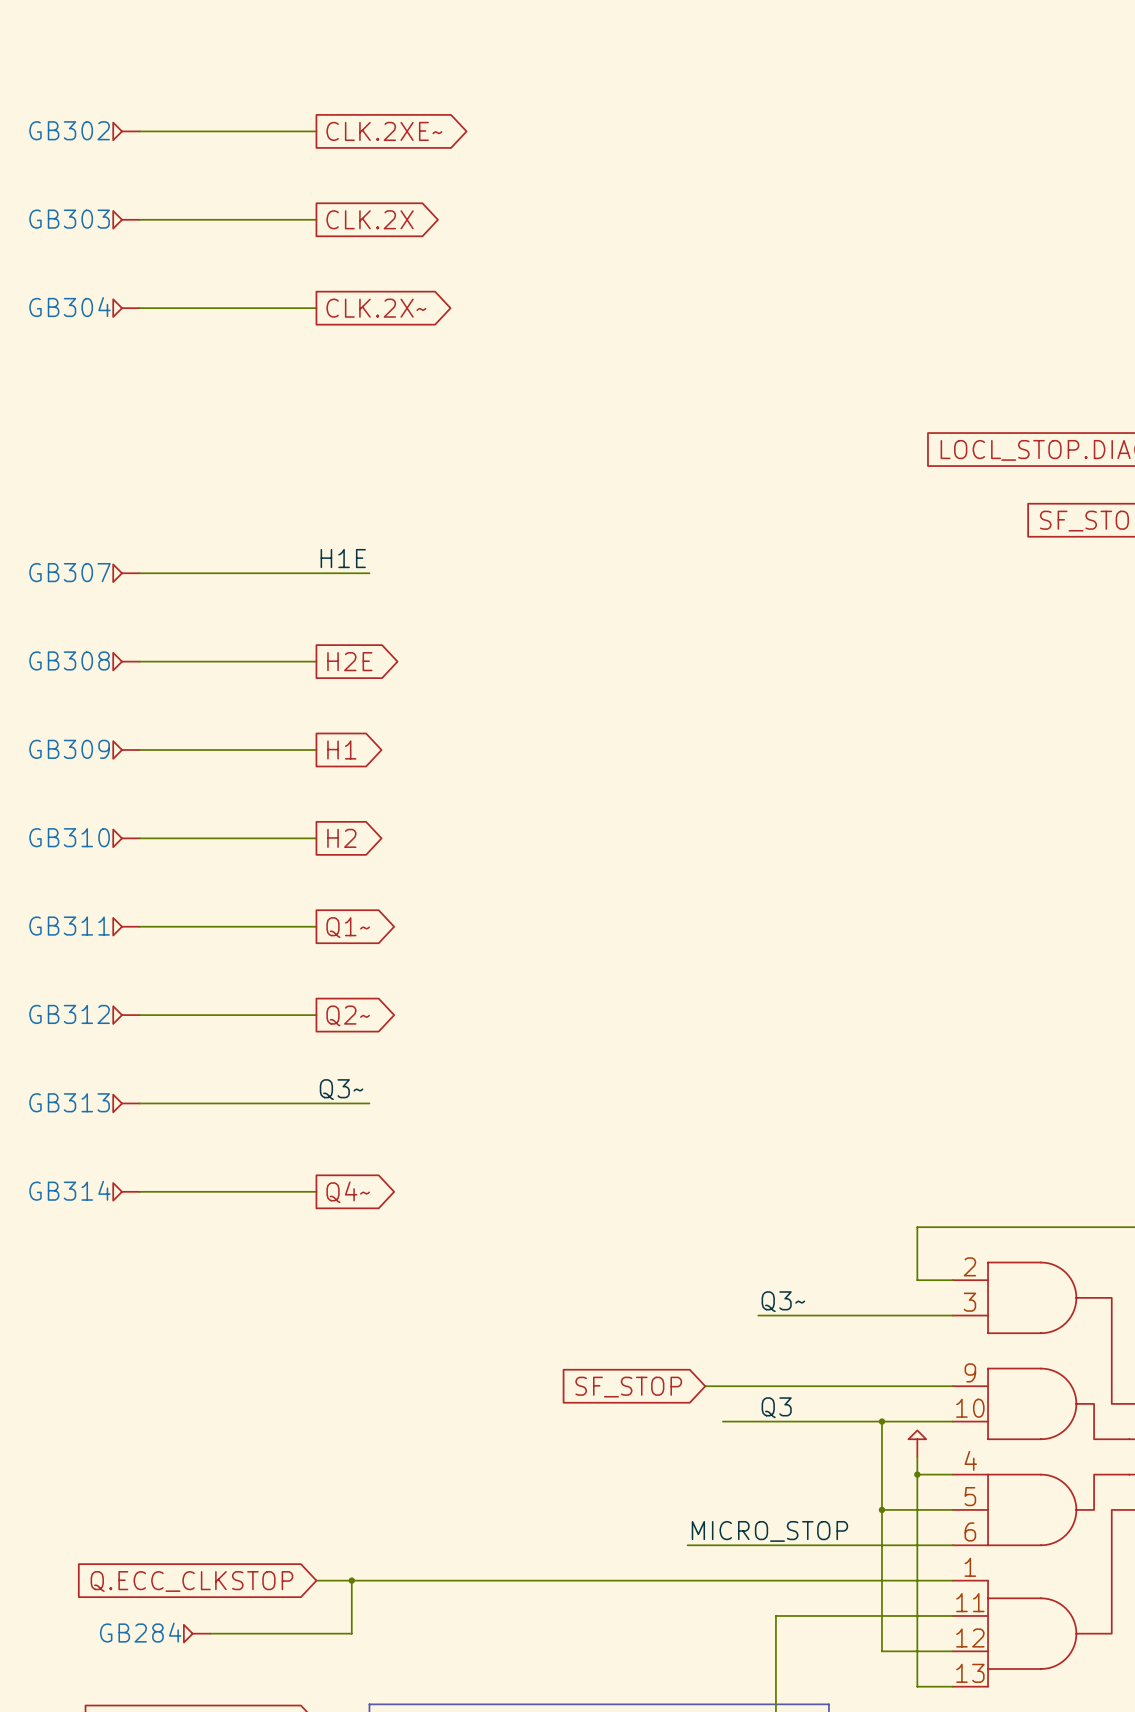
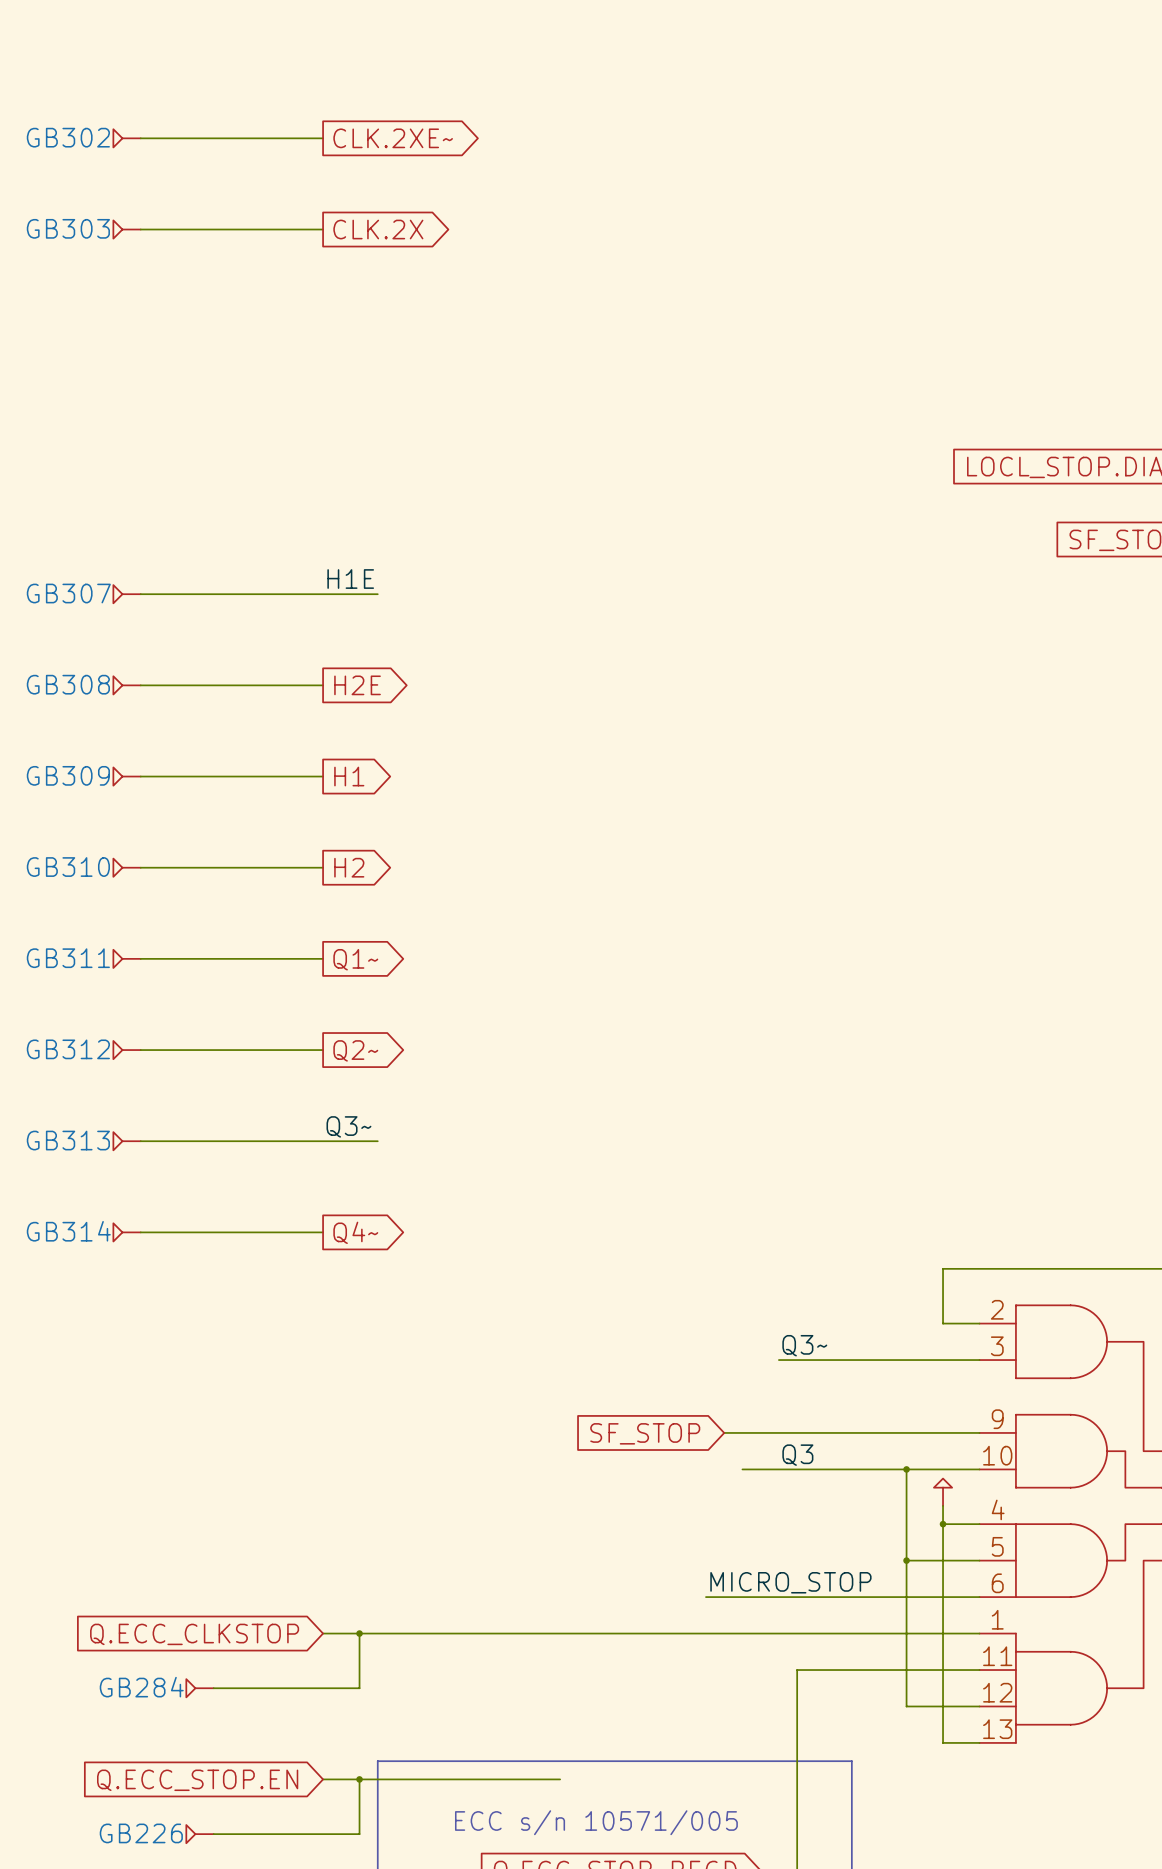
GB304: (126, 308) -> none
wire: (139, 308) (316, 308) -> none
global label: CLK.2X~ (376, 308) -> none

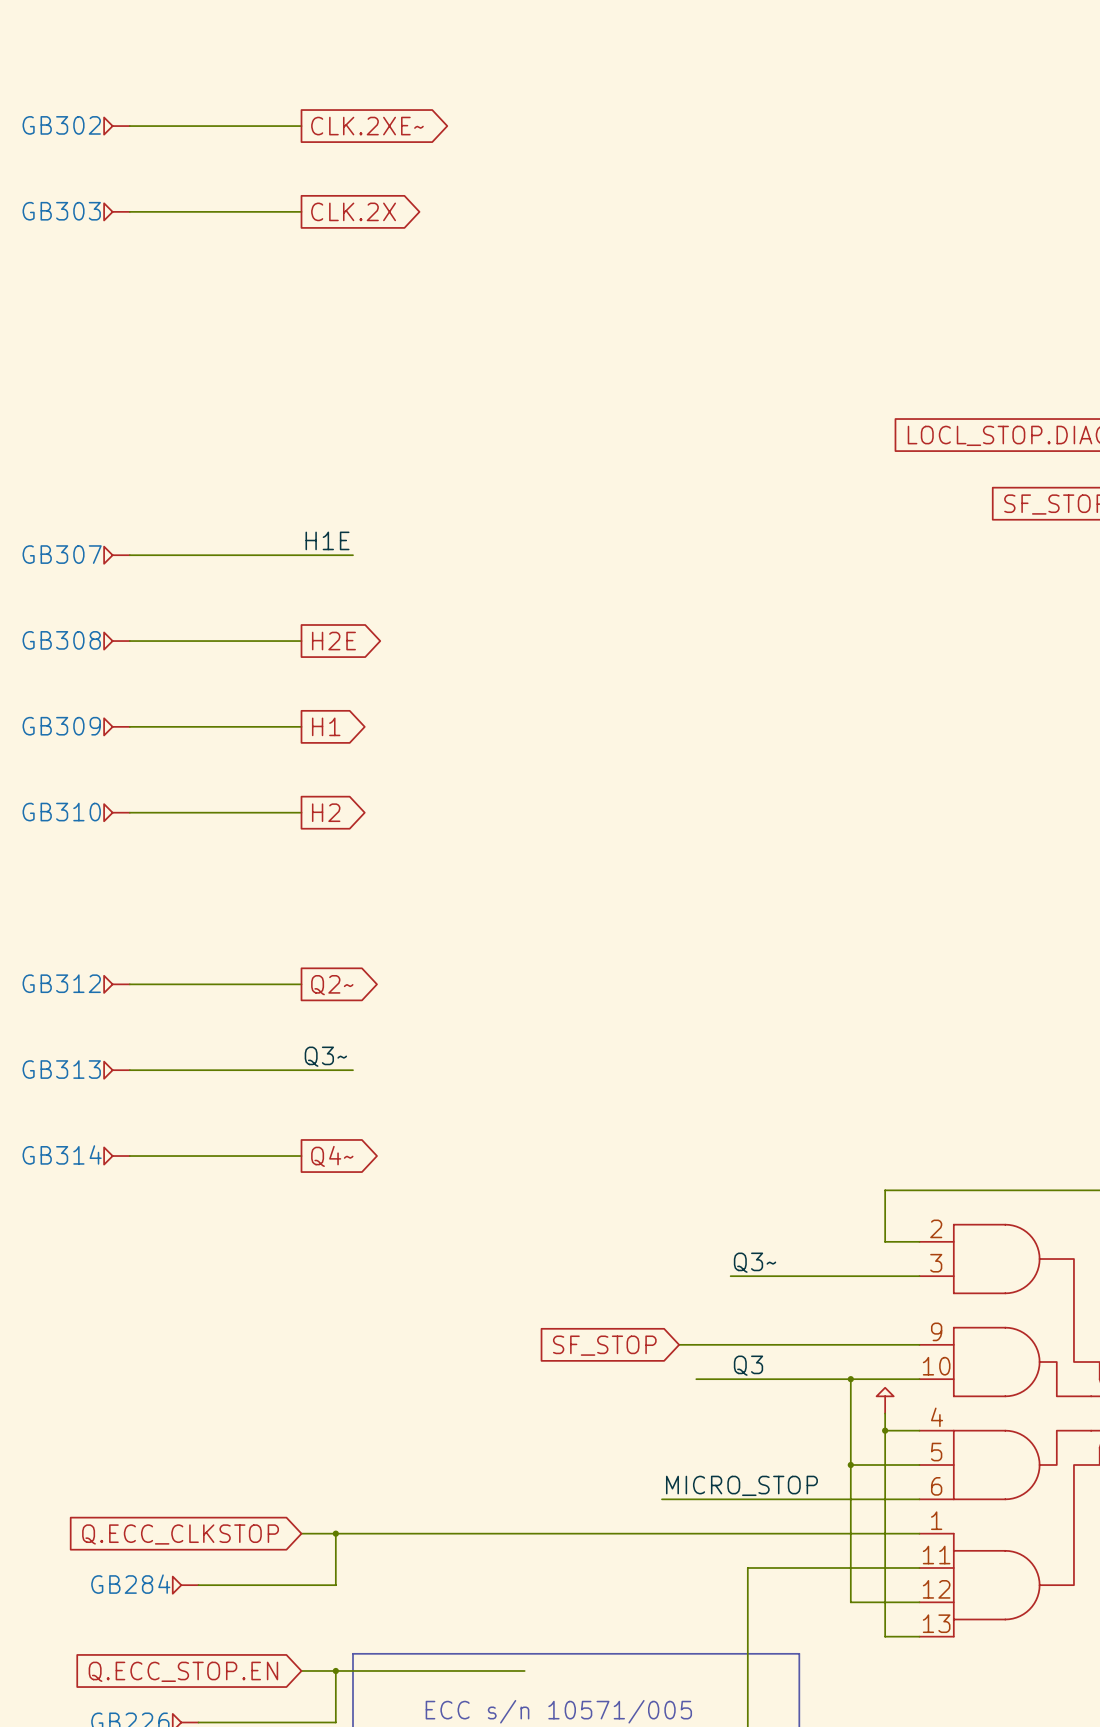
GB311: (126, 958) -> none
wire: (140, 958) (323, 958) -> none
global label: Q1~ (355, 959) -> none

